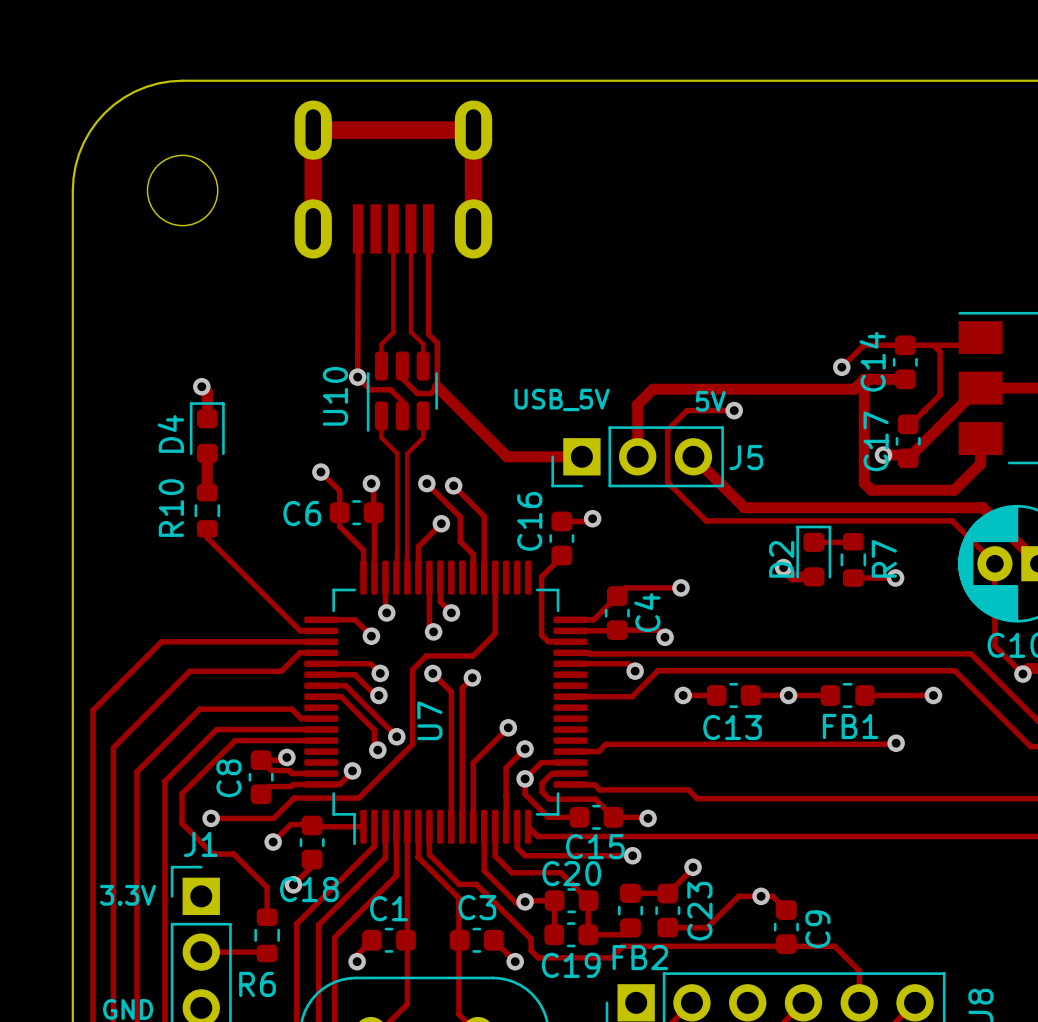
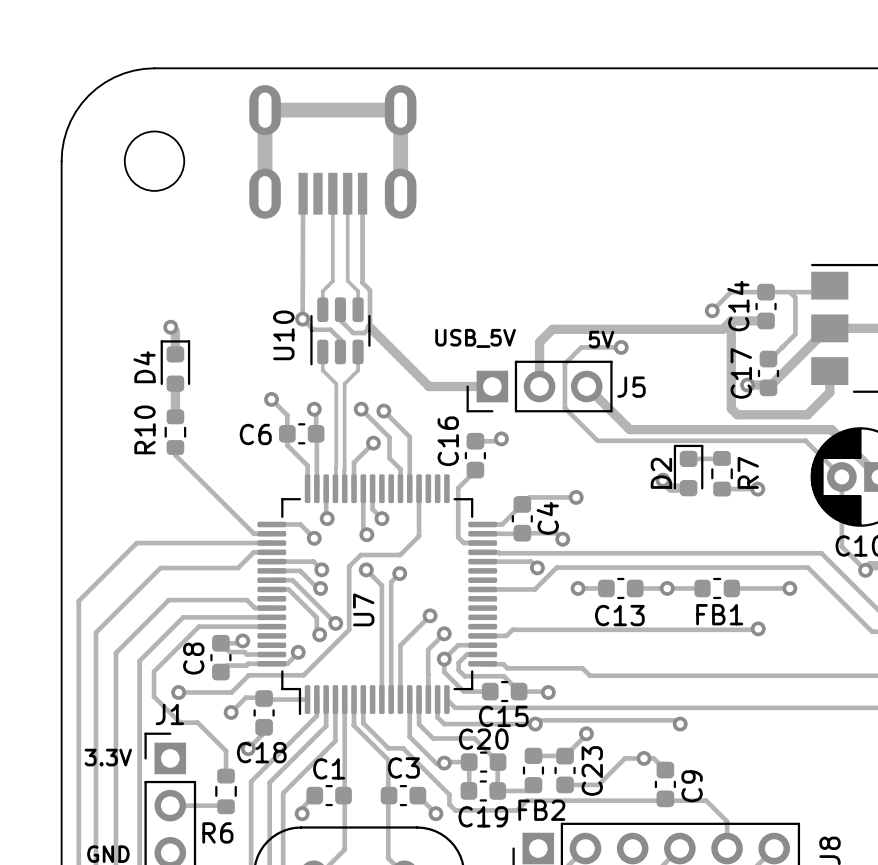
track: none -> (535, 724) (539, 720) (676, 720) (680, 724)
via: none -> (680, 724)

